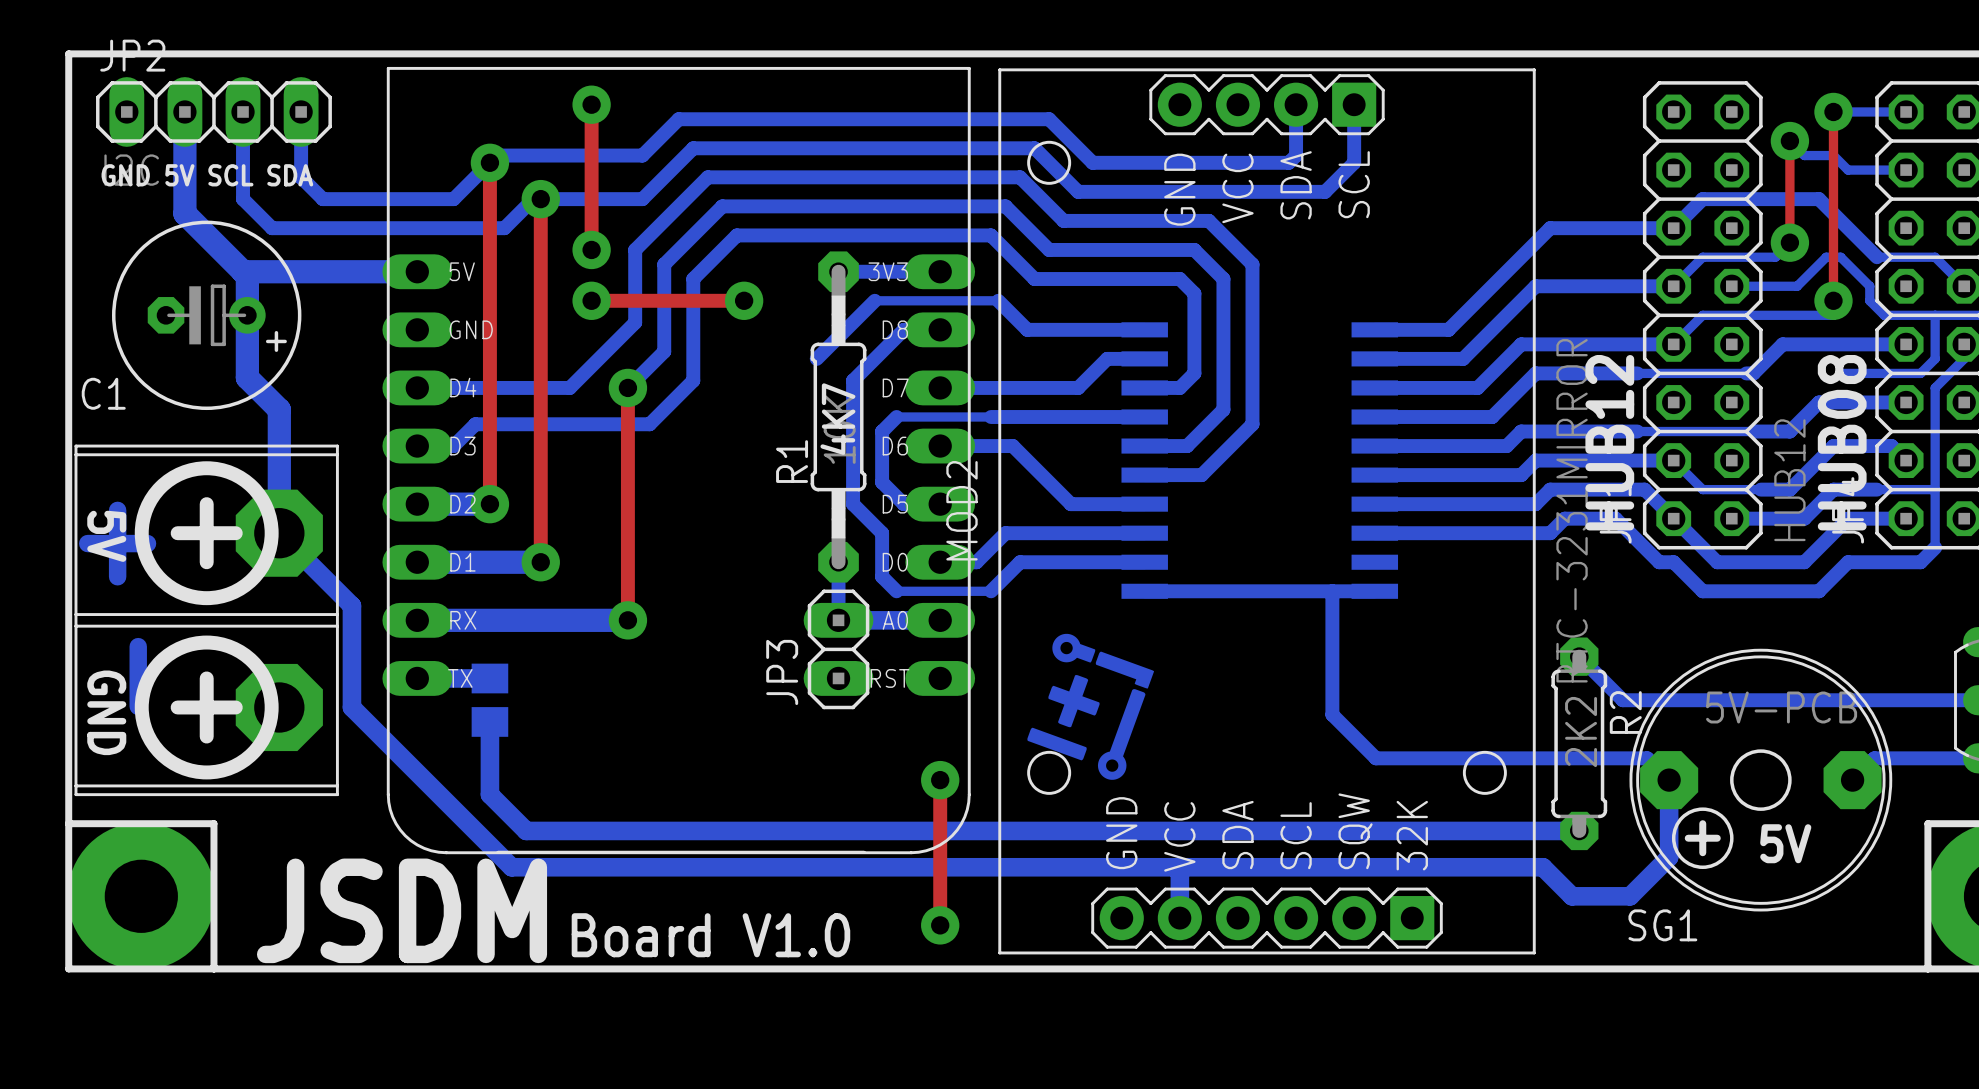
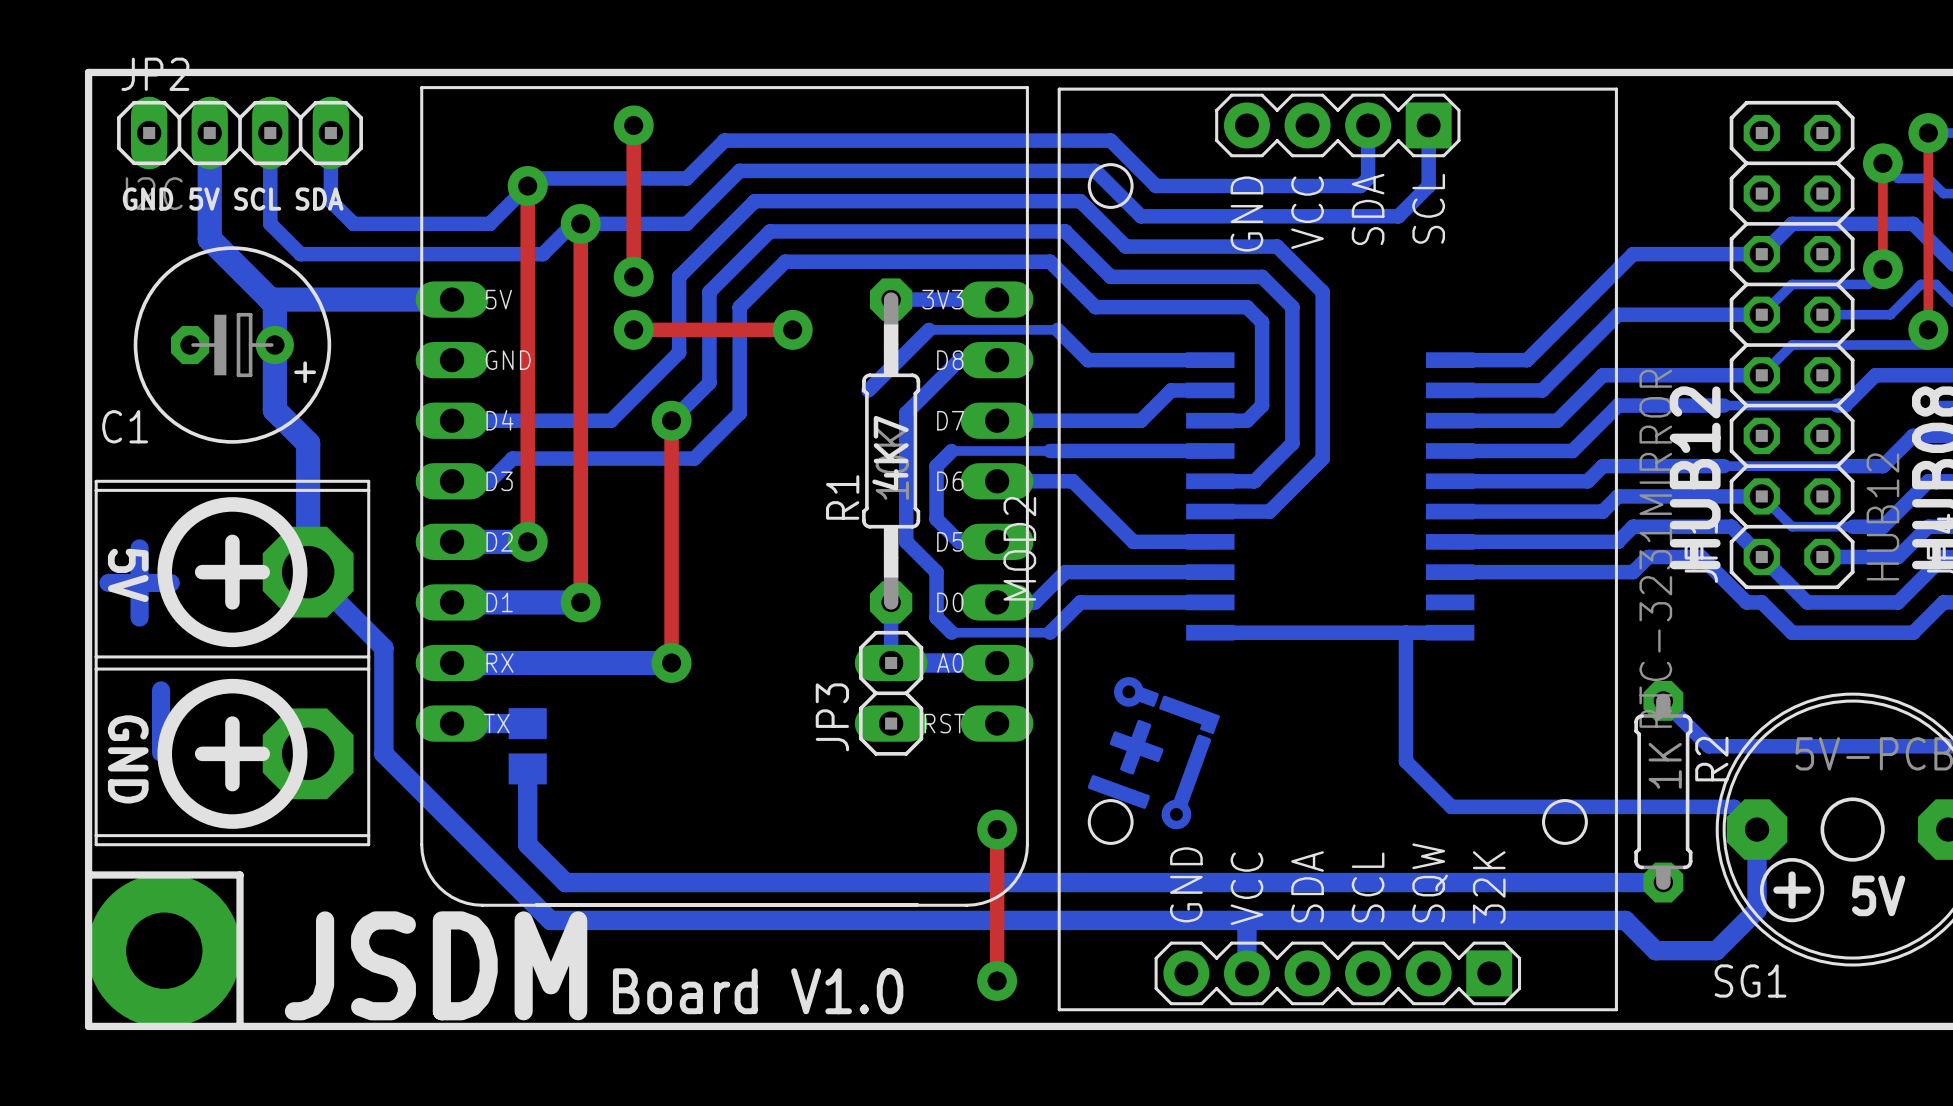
R2 value: 2K2 (1581, 732) -> 1K (1665, 765)

